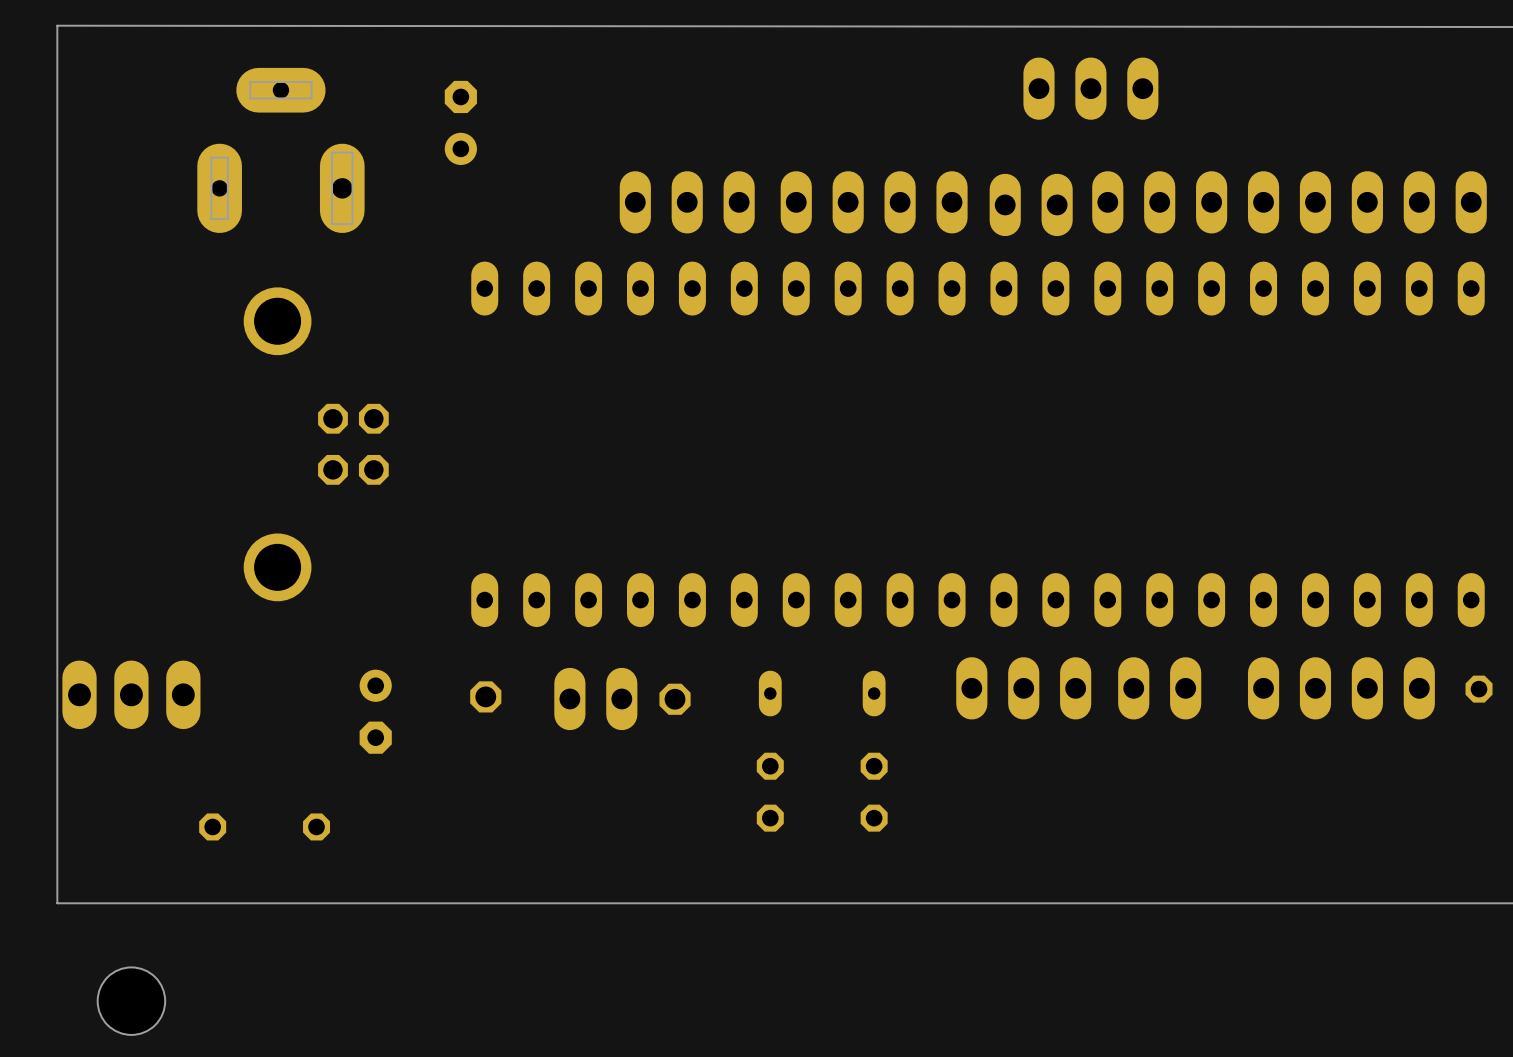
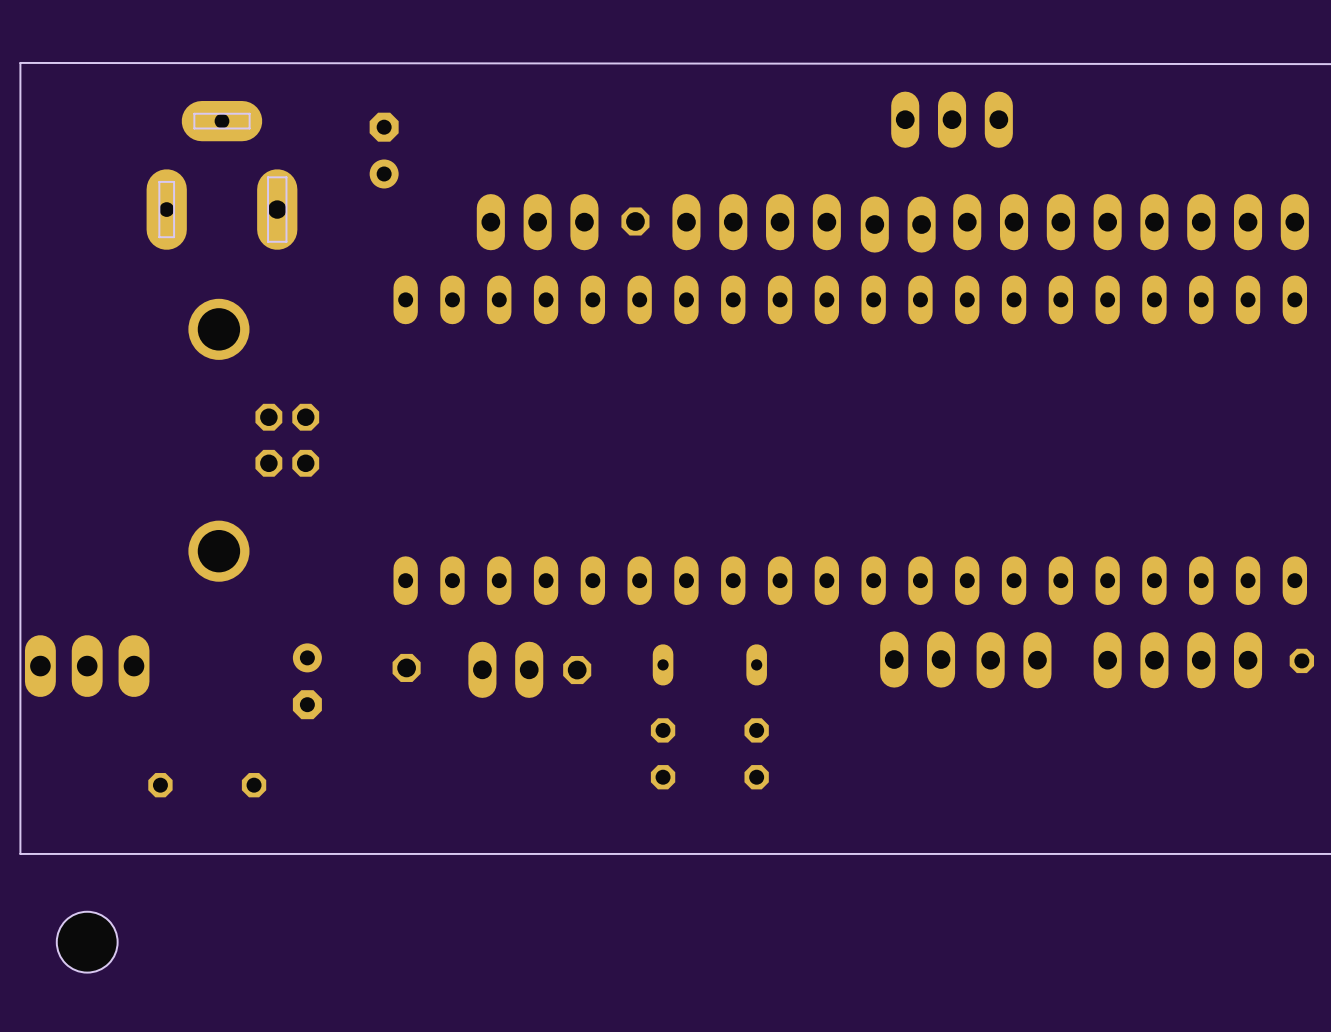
part: none -> (635, 221)
part position: (687, 202) -> (537, 222)
part: none -> (917, 659)
part: (1023, 688) -> none

